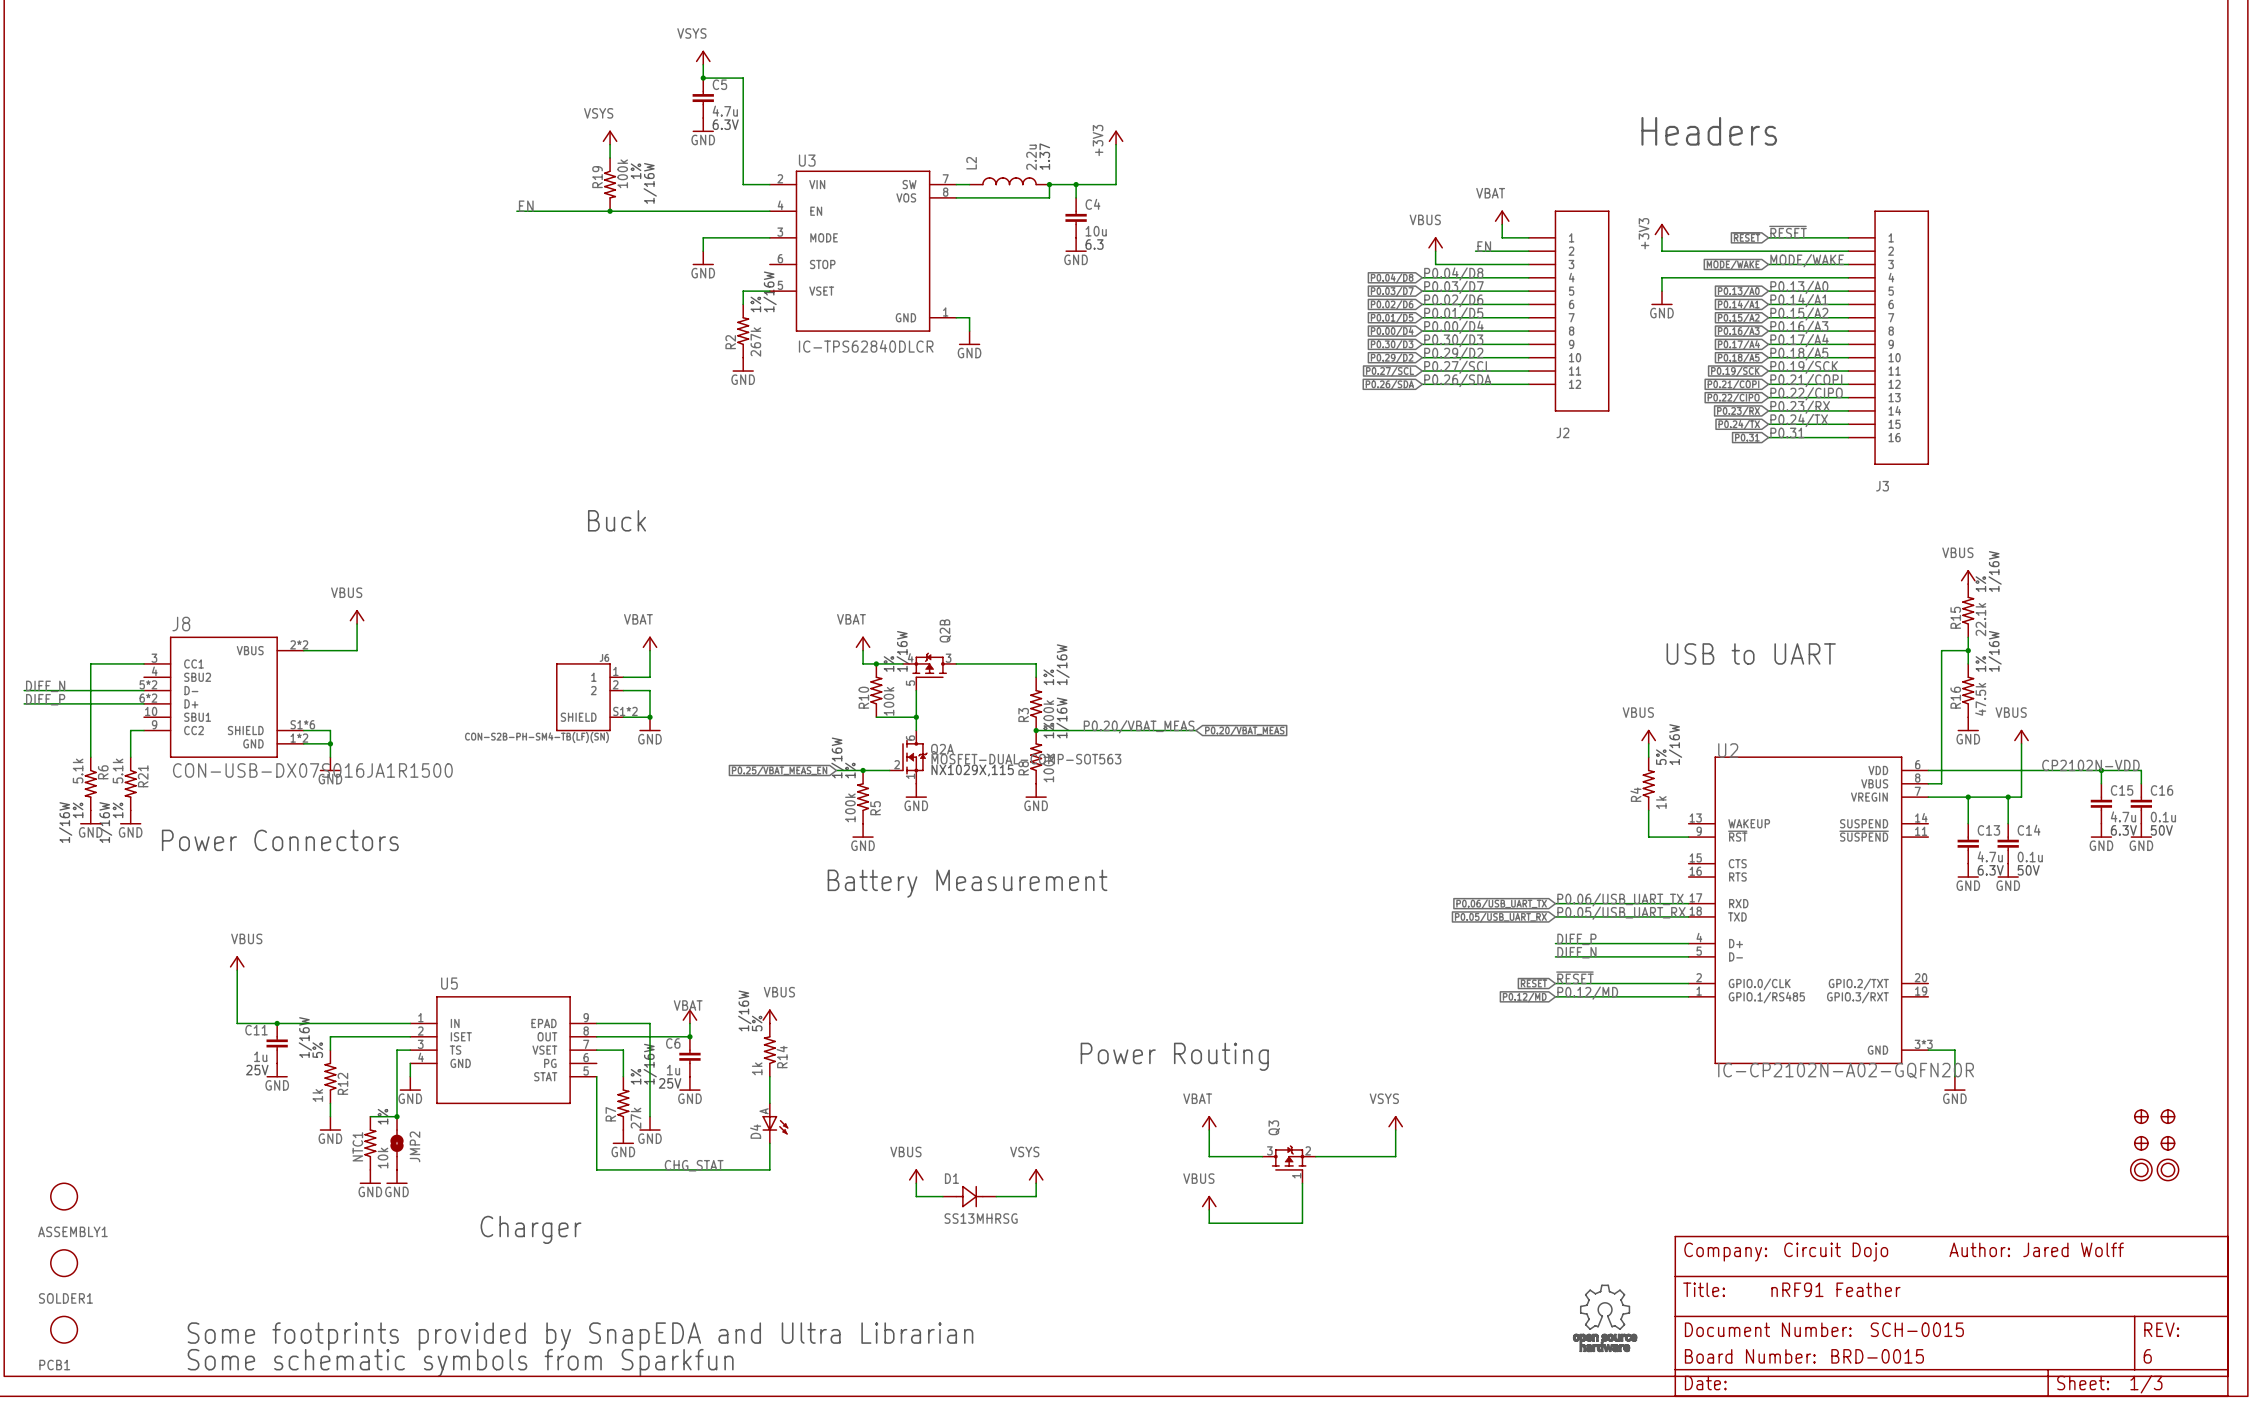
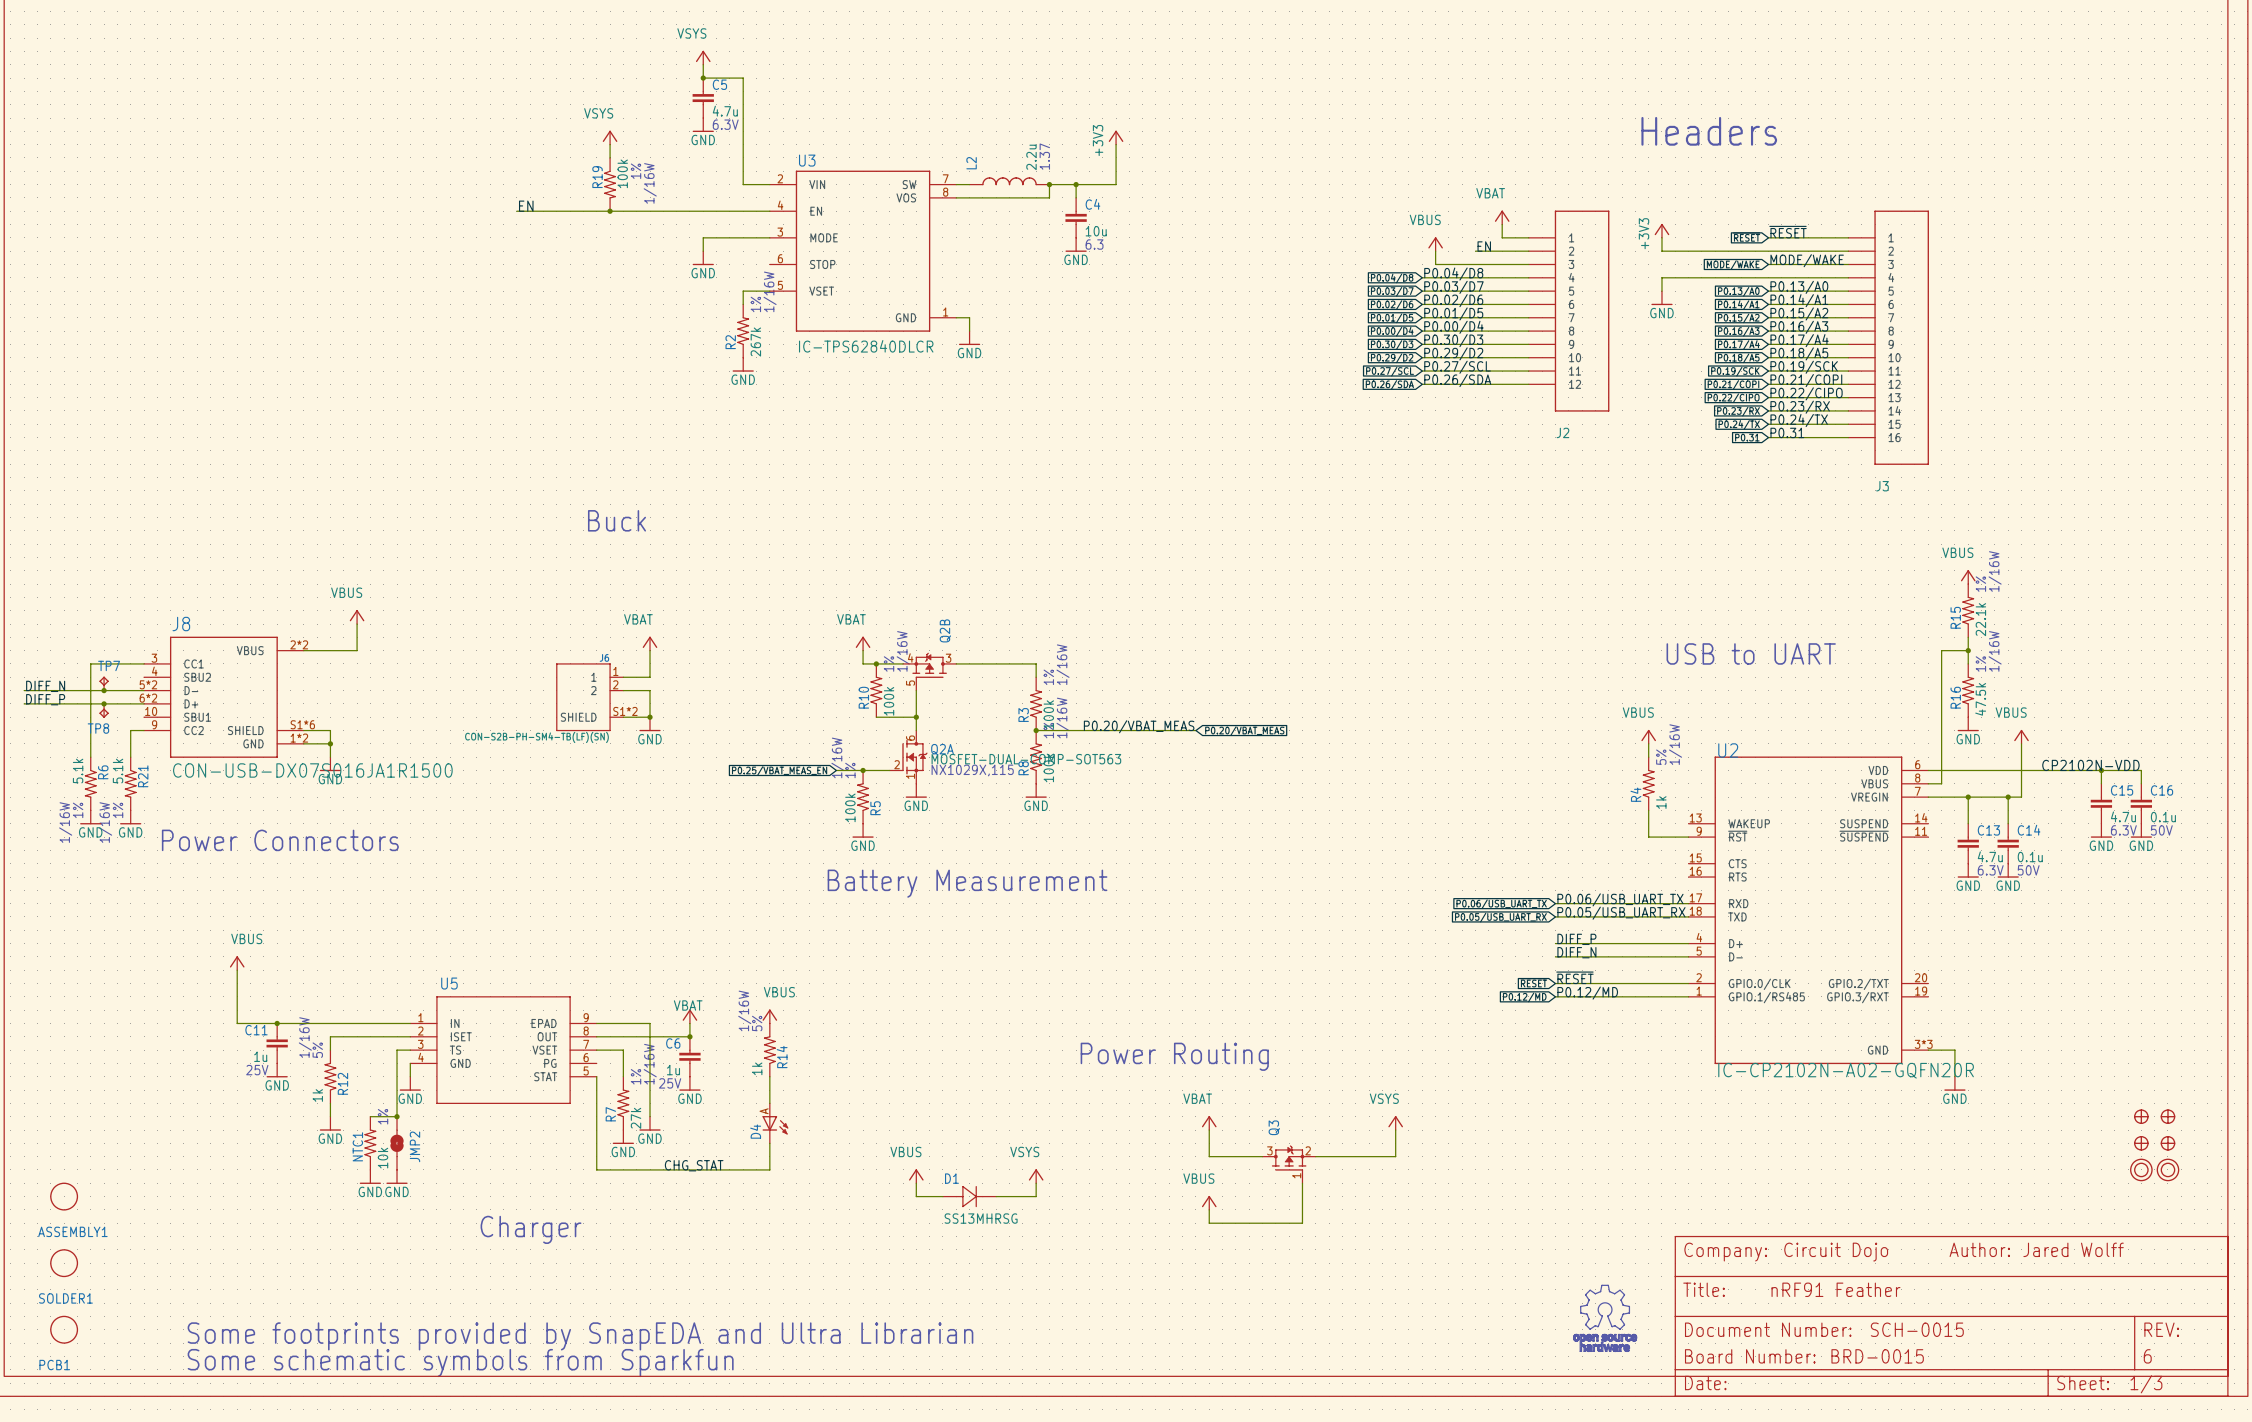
TP7: none -> (104, 683)
junction: none -> (104, 690)
junction: none -> (104, 703)
TP8: none -> (104, 710)

